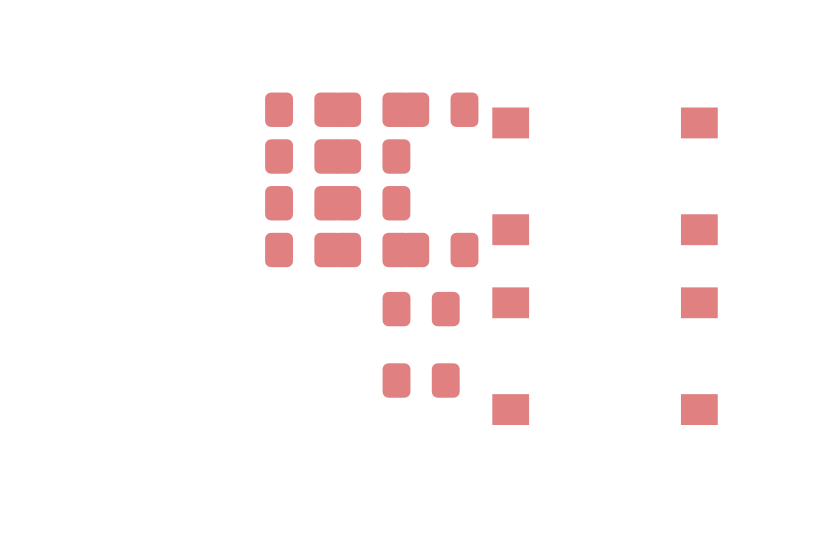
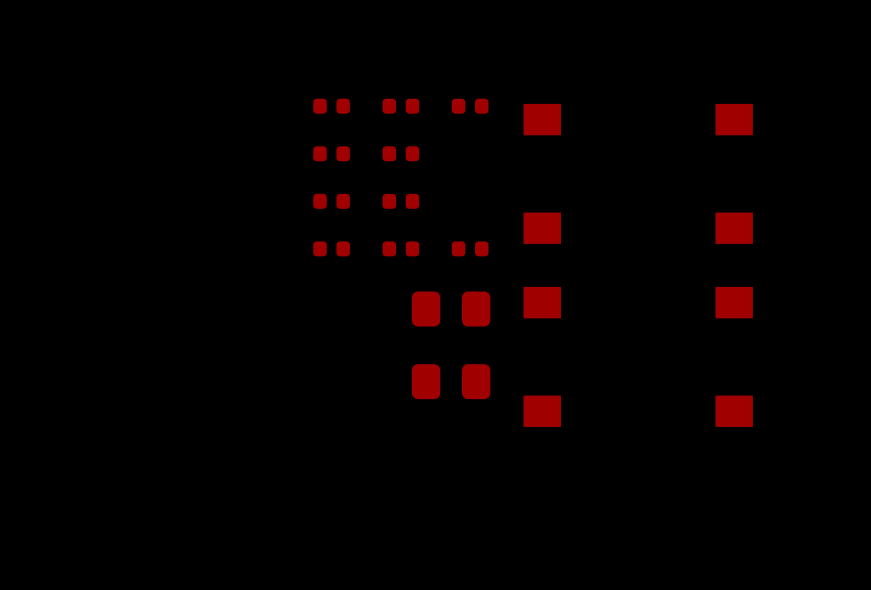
part footprint: [265, 92, 343, 127] -> [313, 98, 350, 114]
part footprint: [333, 92, 411, 127] -> [382, 98, 420, 114]
part footprint: [401, 92, 479, 127] -> [451, 98, 489, 114]
part footprint: [265, 139, 343, 174] -> [313, 146, 350, 162]
part footprint: [333, 139, 411, 174] -> [382, 146, 420, 162]
part footprint: [265, 186, 343, 221] -> [313, 193, 350, 209]
part footprint: [333, 186, 411, 221] -> [382, 193, 420, 209]
part footprint: [265, 232, 343, 268] -> [313, 241, 350, 257]
part footprint: [333, 232, 411, 268] -> [382, 241, 420, 257]
part footprint: [401, 232, 479, 268] -> [451, 241, 489, 257]

